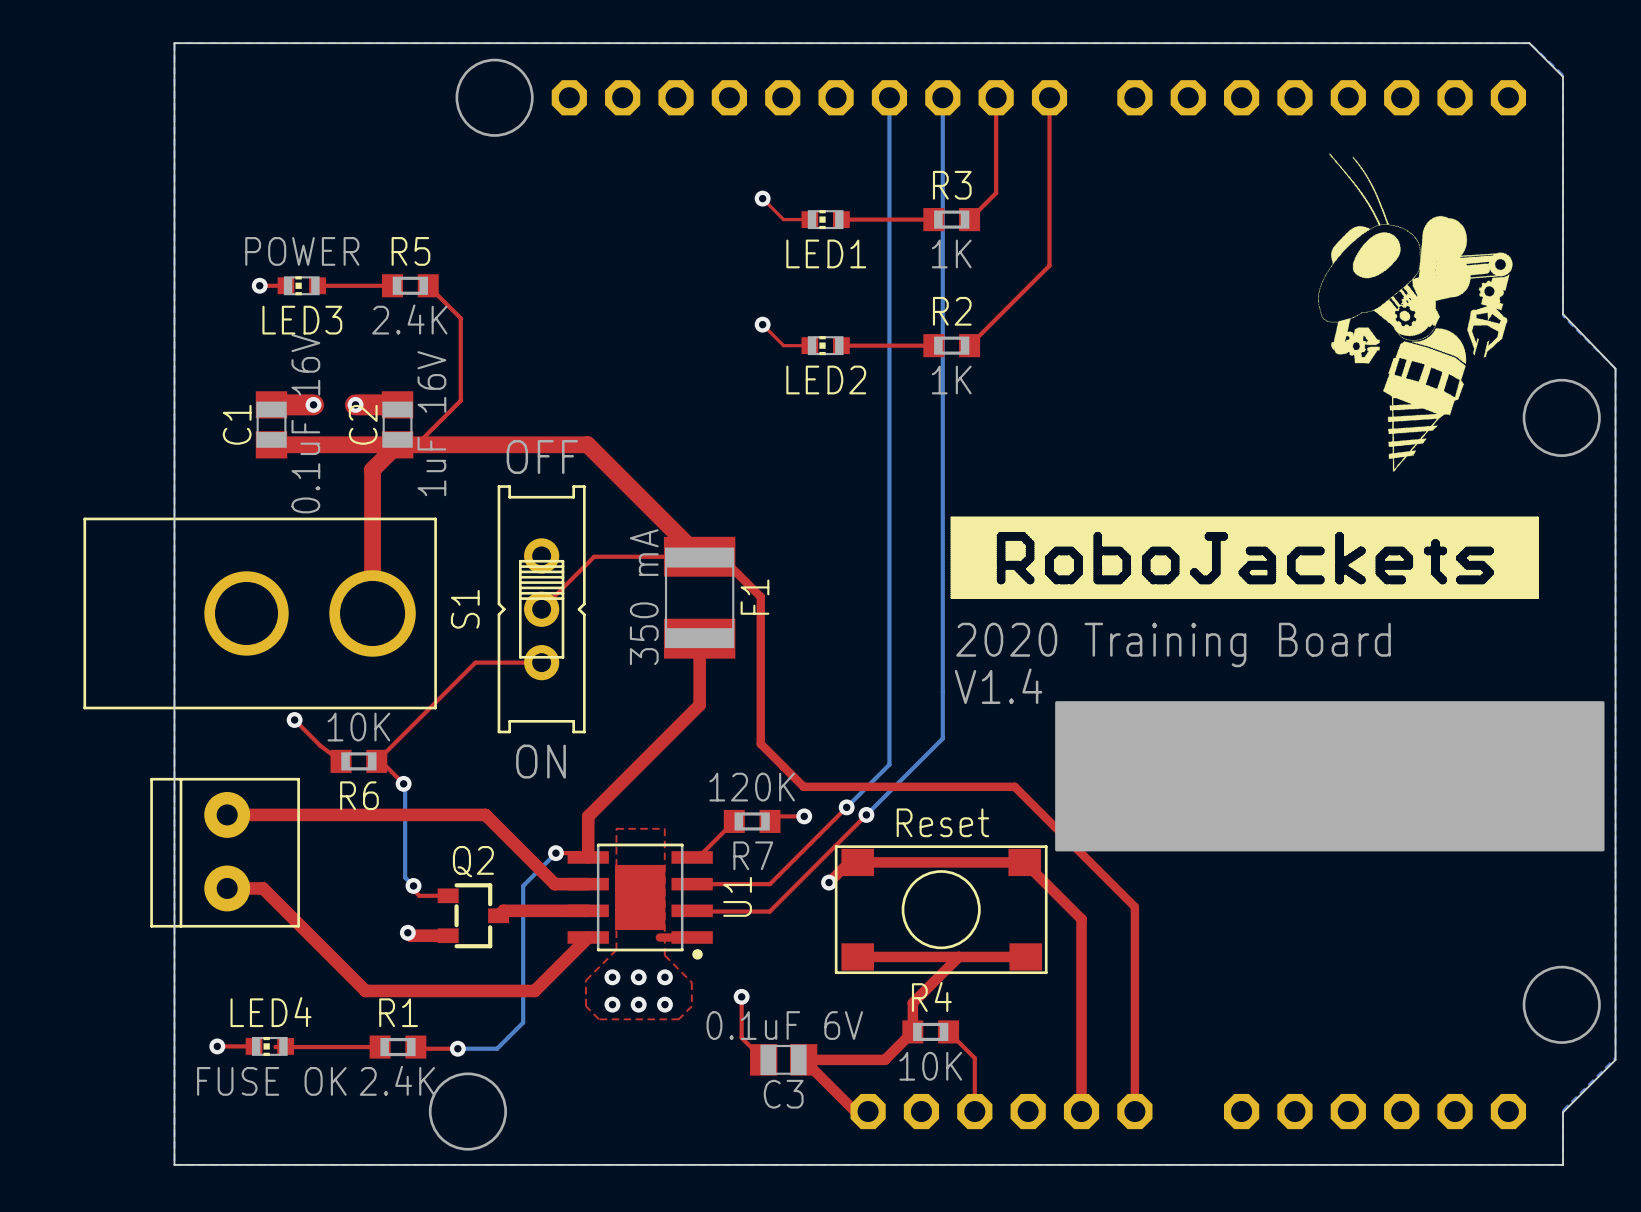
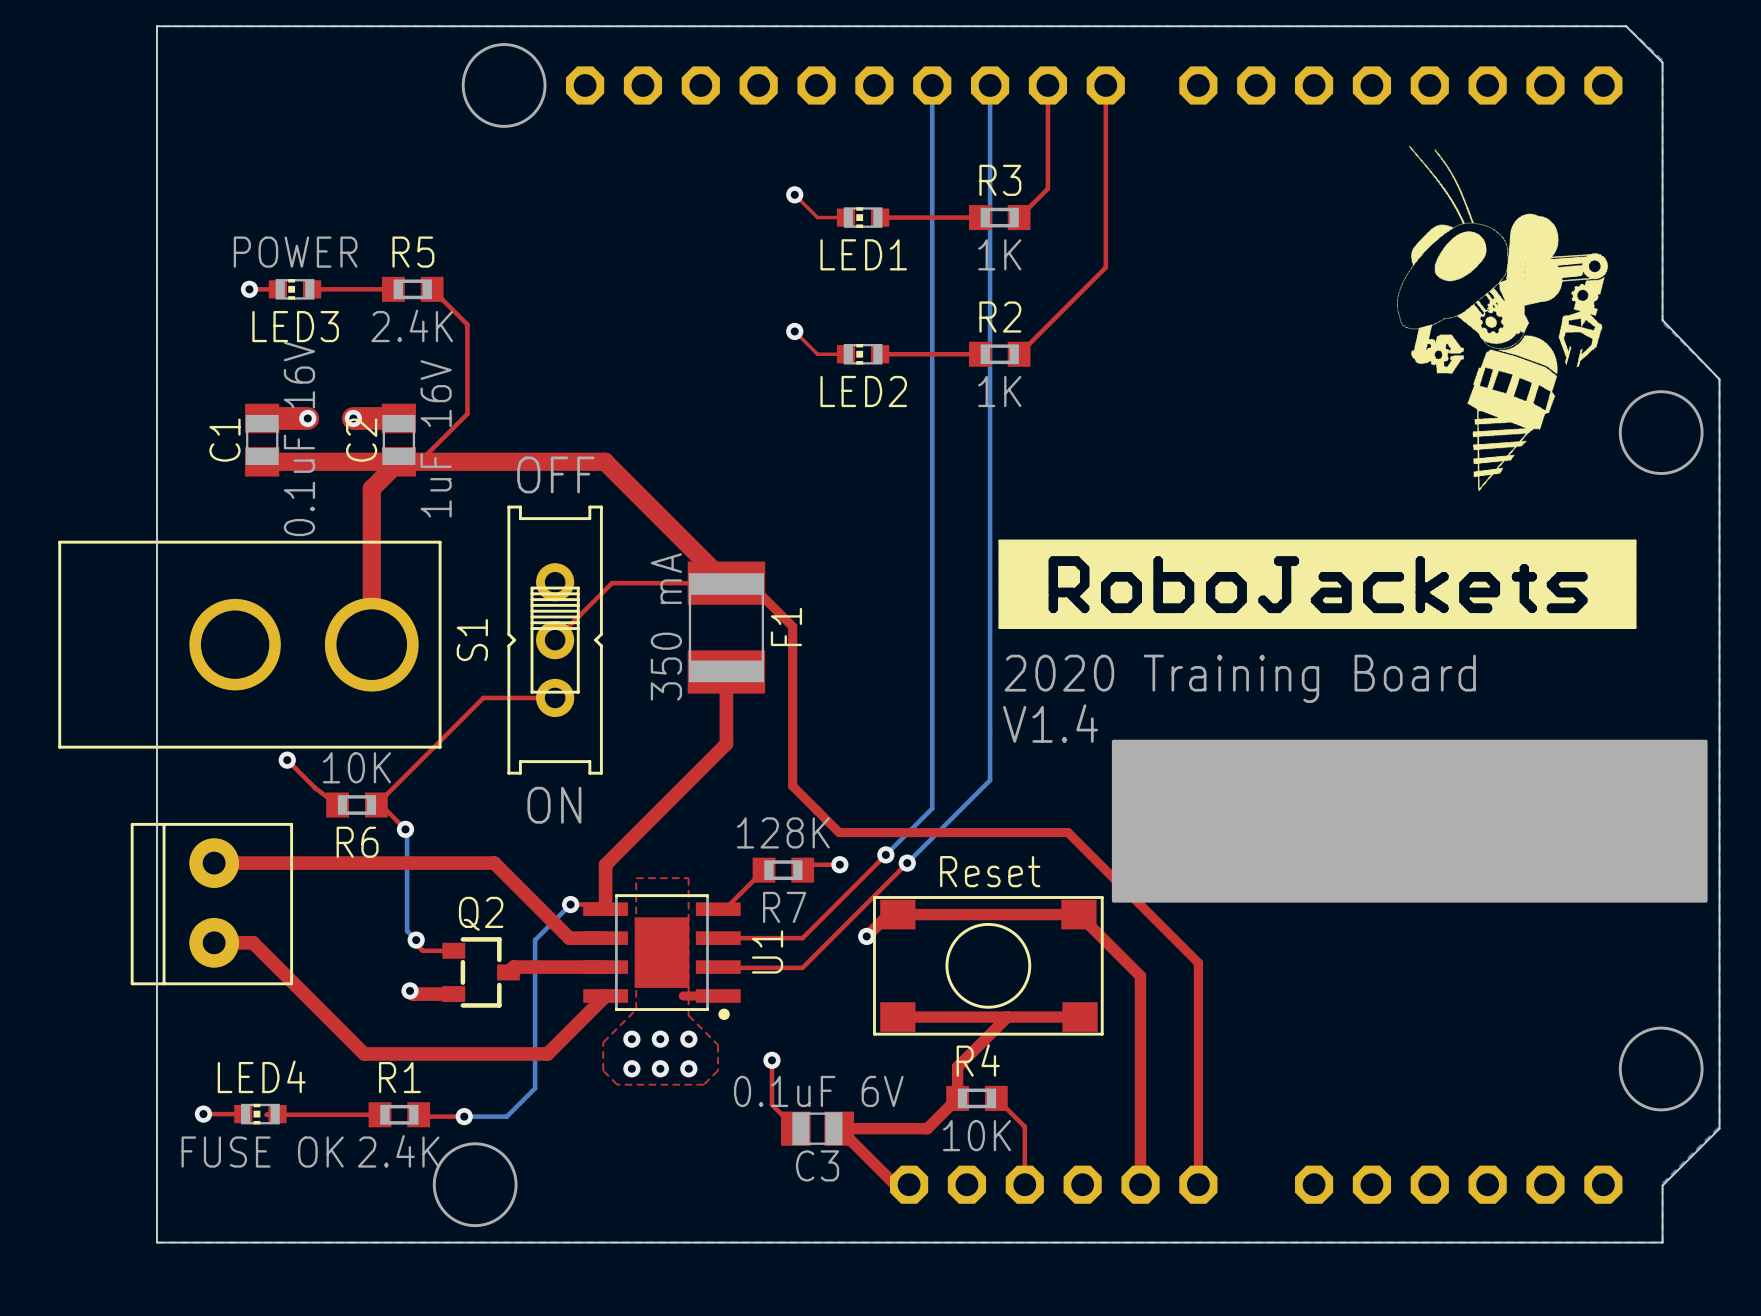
R7 value: 120K (752, 787) -> 128K (783, 832)

